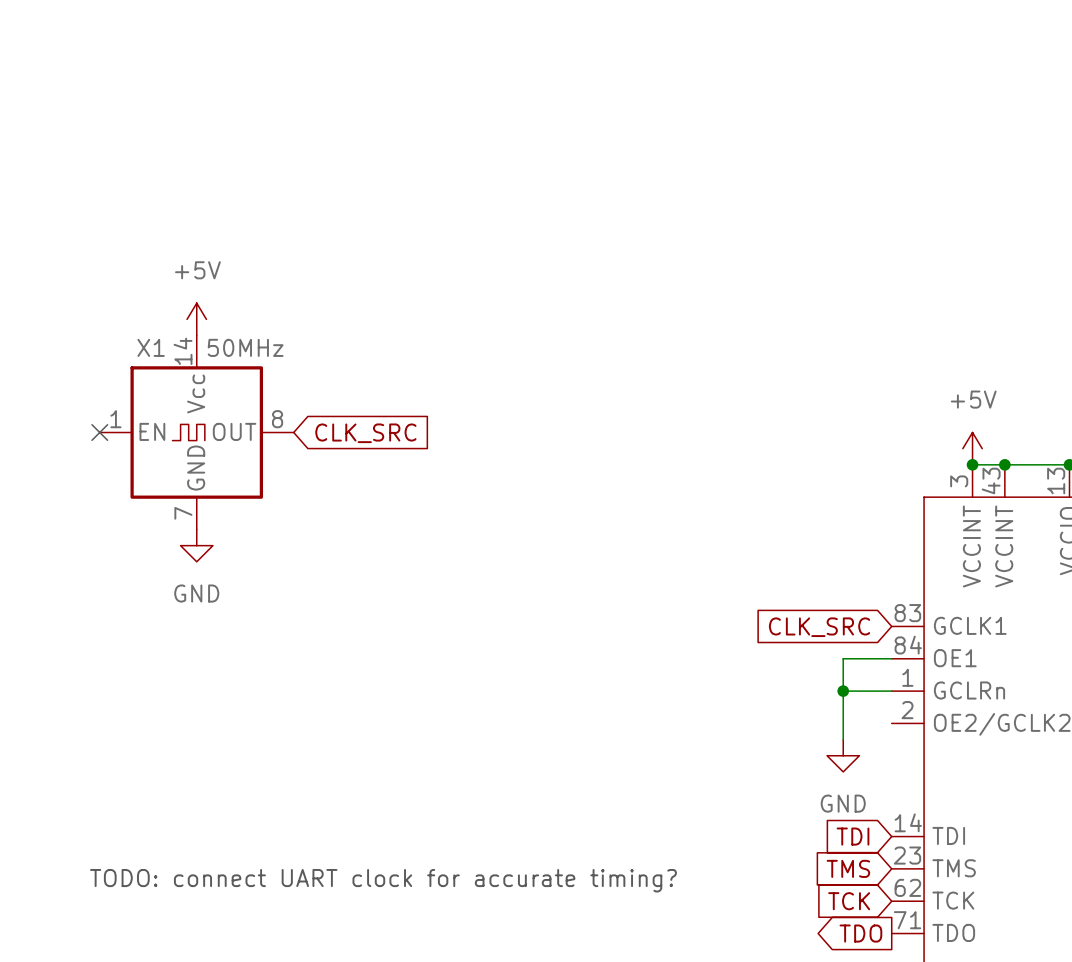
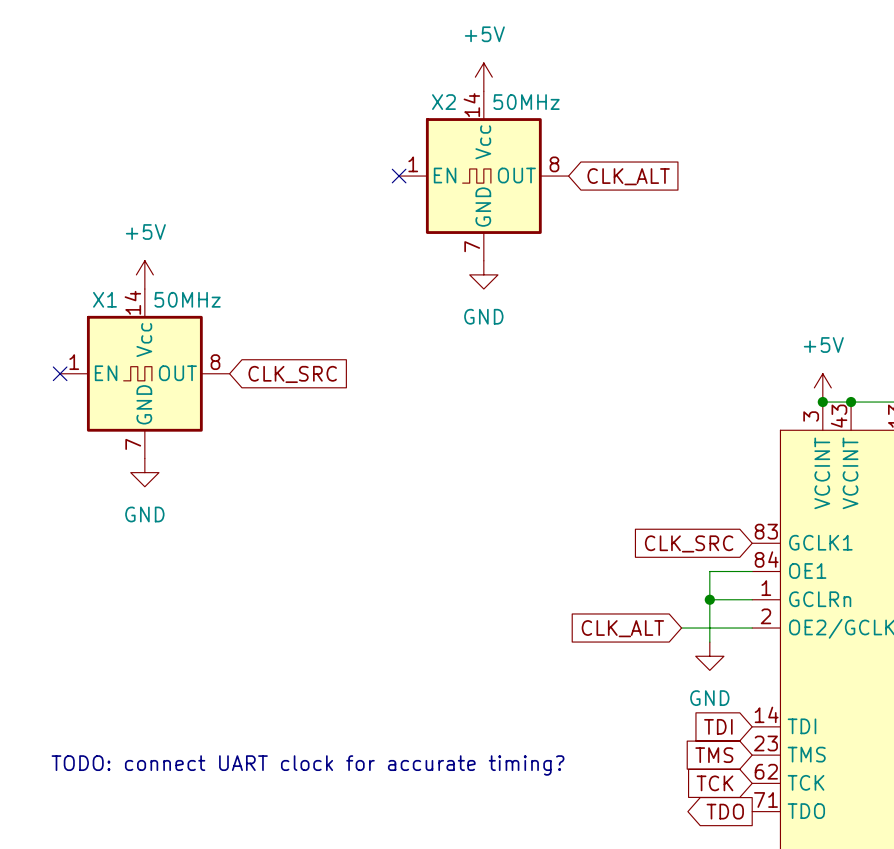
power symbol: none -> +5V (483, 77)
no-connect mark: none -> (399, 176)
X2: none -> 50MHz (483, 176)
global label: none -> CLK_ALT (628, 176)
power symbol: none -> GND (483, 274)
wire: none -> (681, 628) (752, 628)
global label: none -> CLK_ALT (622, 628)

